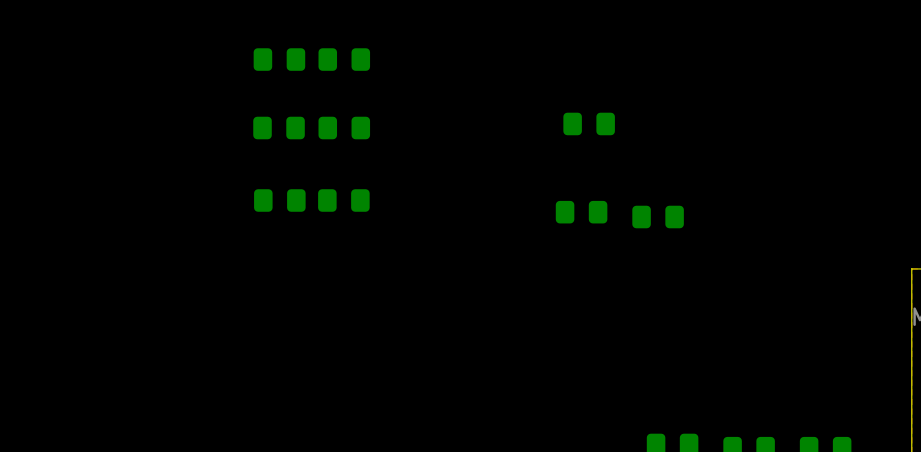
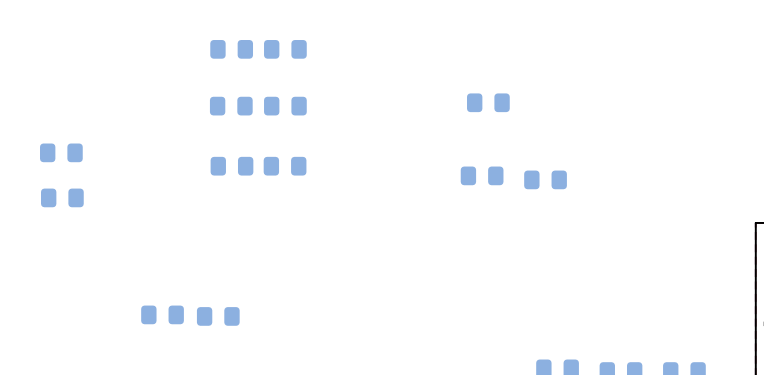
part: none -> (61, 152)
part: none -> (62, 197)
part: none -> (162, 314)
part: none -> (218, 316)

